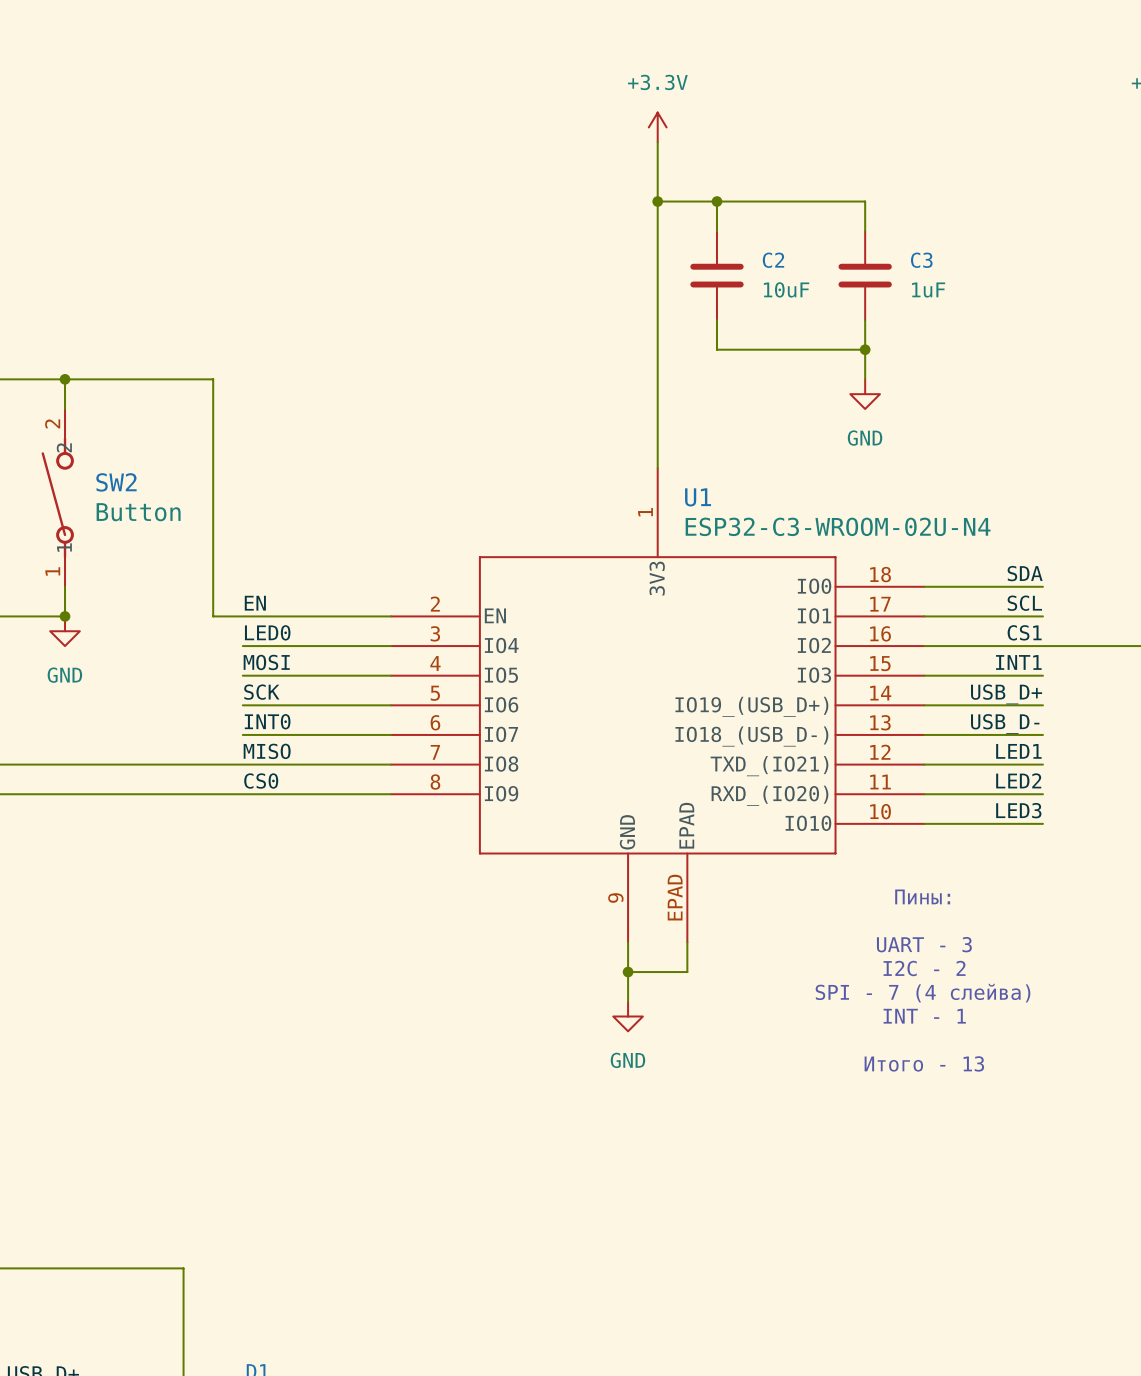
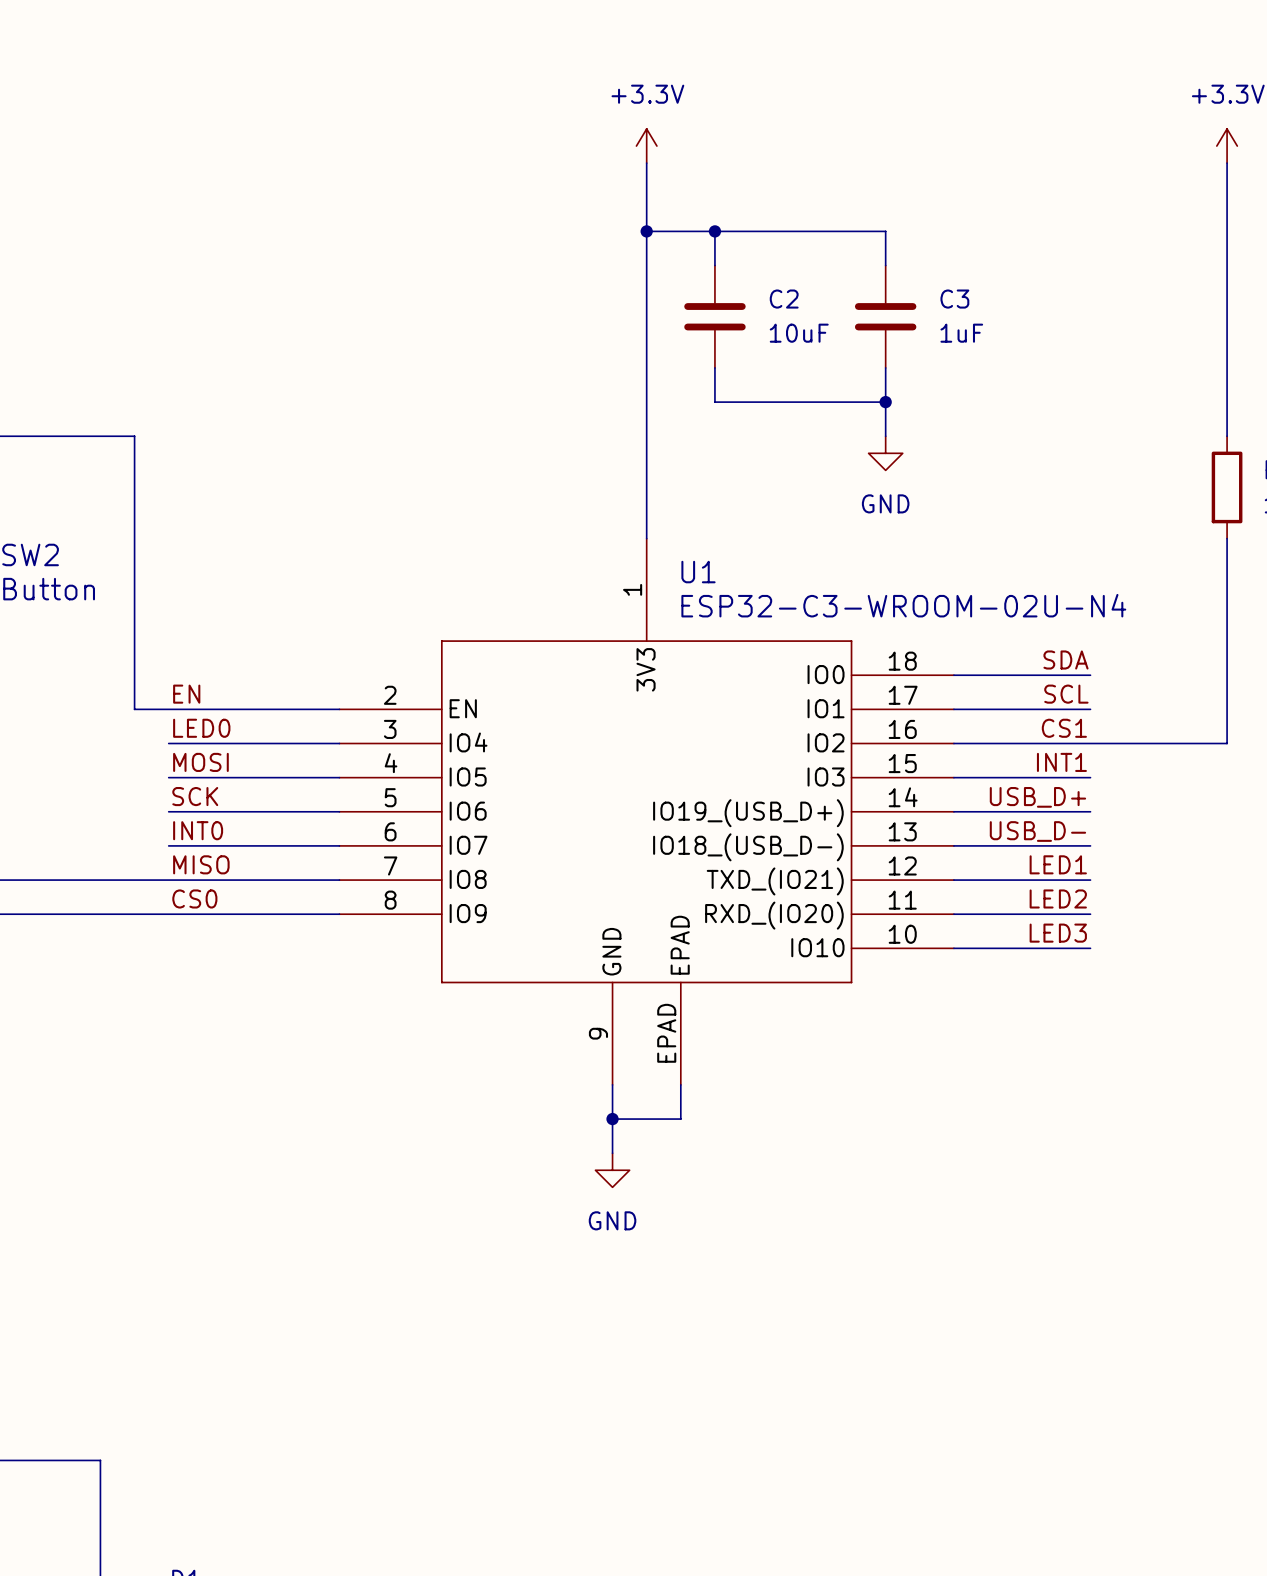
text: Пины: (922, 896) -> none
text: UART - 3 (924, 944) -> none
text: I2C - 2 (924, 968) -> none
text: SPI - 7 (4 слейва) (923, 993) -> none
text: INT - 1 (924, 1016) -> none
text: Итого - 13 (924, 1063) -> none

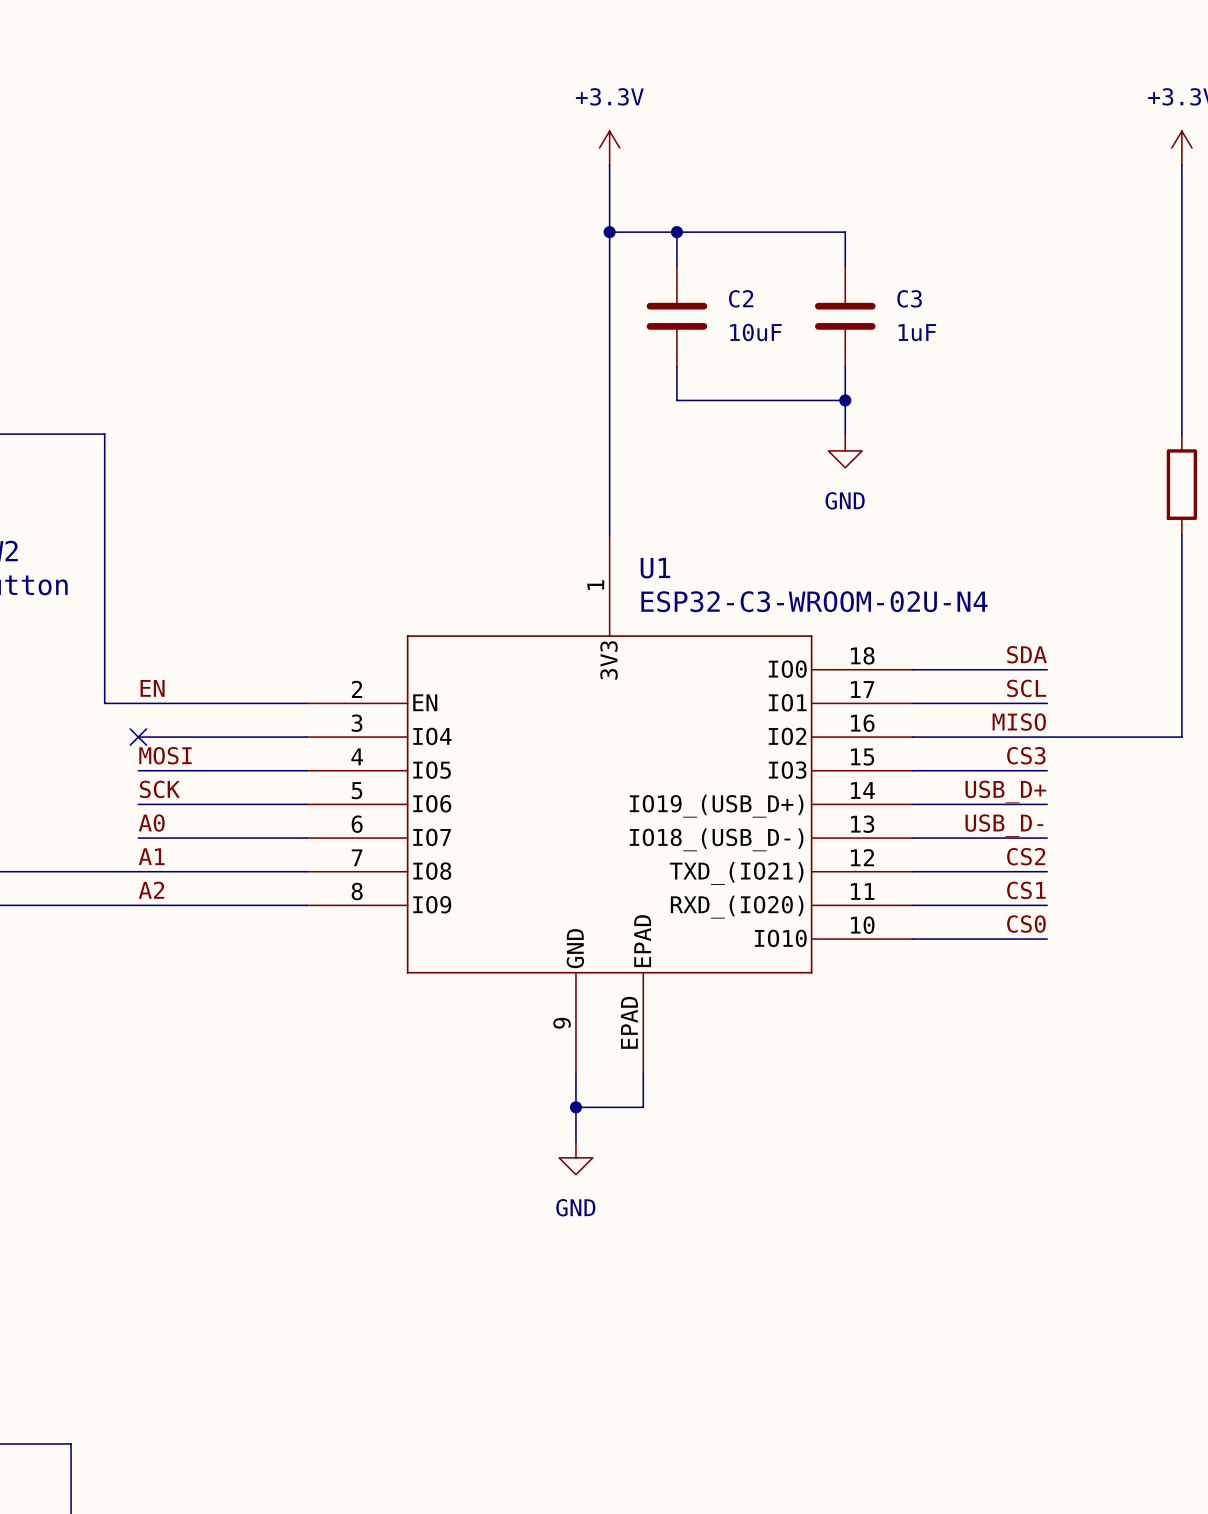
label: LED0 (201, 728) -> none
label: CS1 (1064, 728) -> MISO (1019, 722)
no-connect mark: none -> (138, 737)
label: INT1 (1061, 762) -> CS3 (1026, 755)
label: INT0 (198, 830) -> A0 (151, 823)
label: MISO (201, 864) -> A1 (151, 856)
label: LED1 (1058, 864) -> CS2 (1026, 856)
label: CS0 (194, 898) -> A2 (151, 890)
label: LED2 (1058, 898) -> CS1 (1026, 890)
label: LED3 (1058, 933) -> CS0 (1026, 924)

